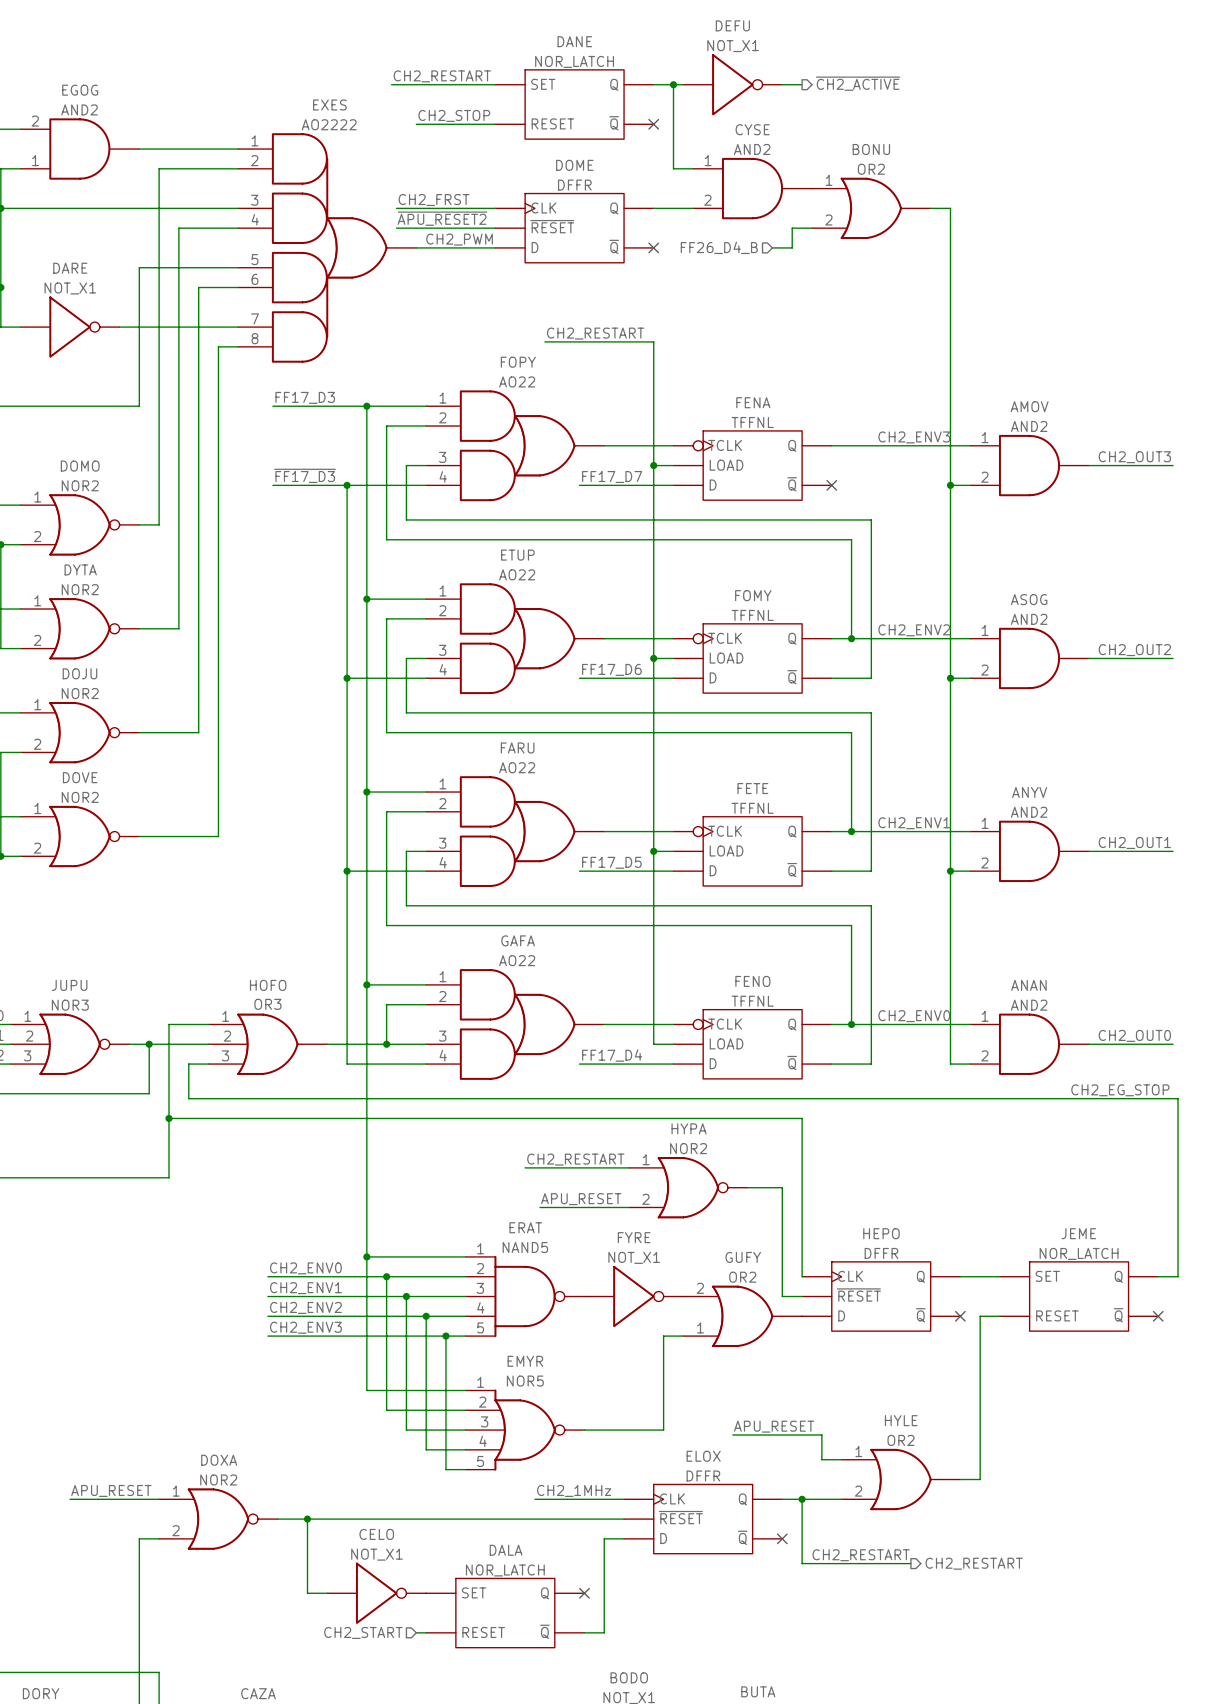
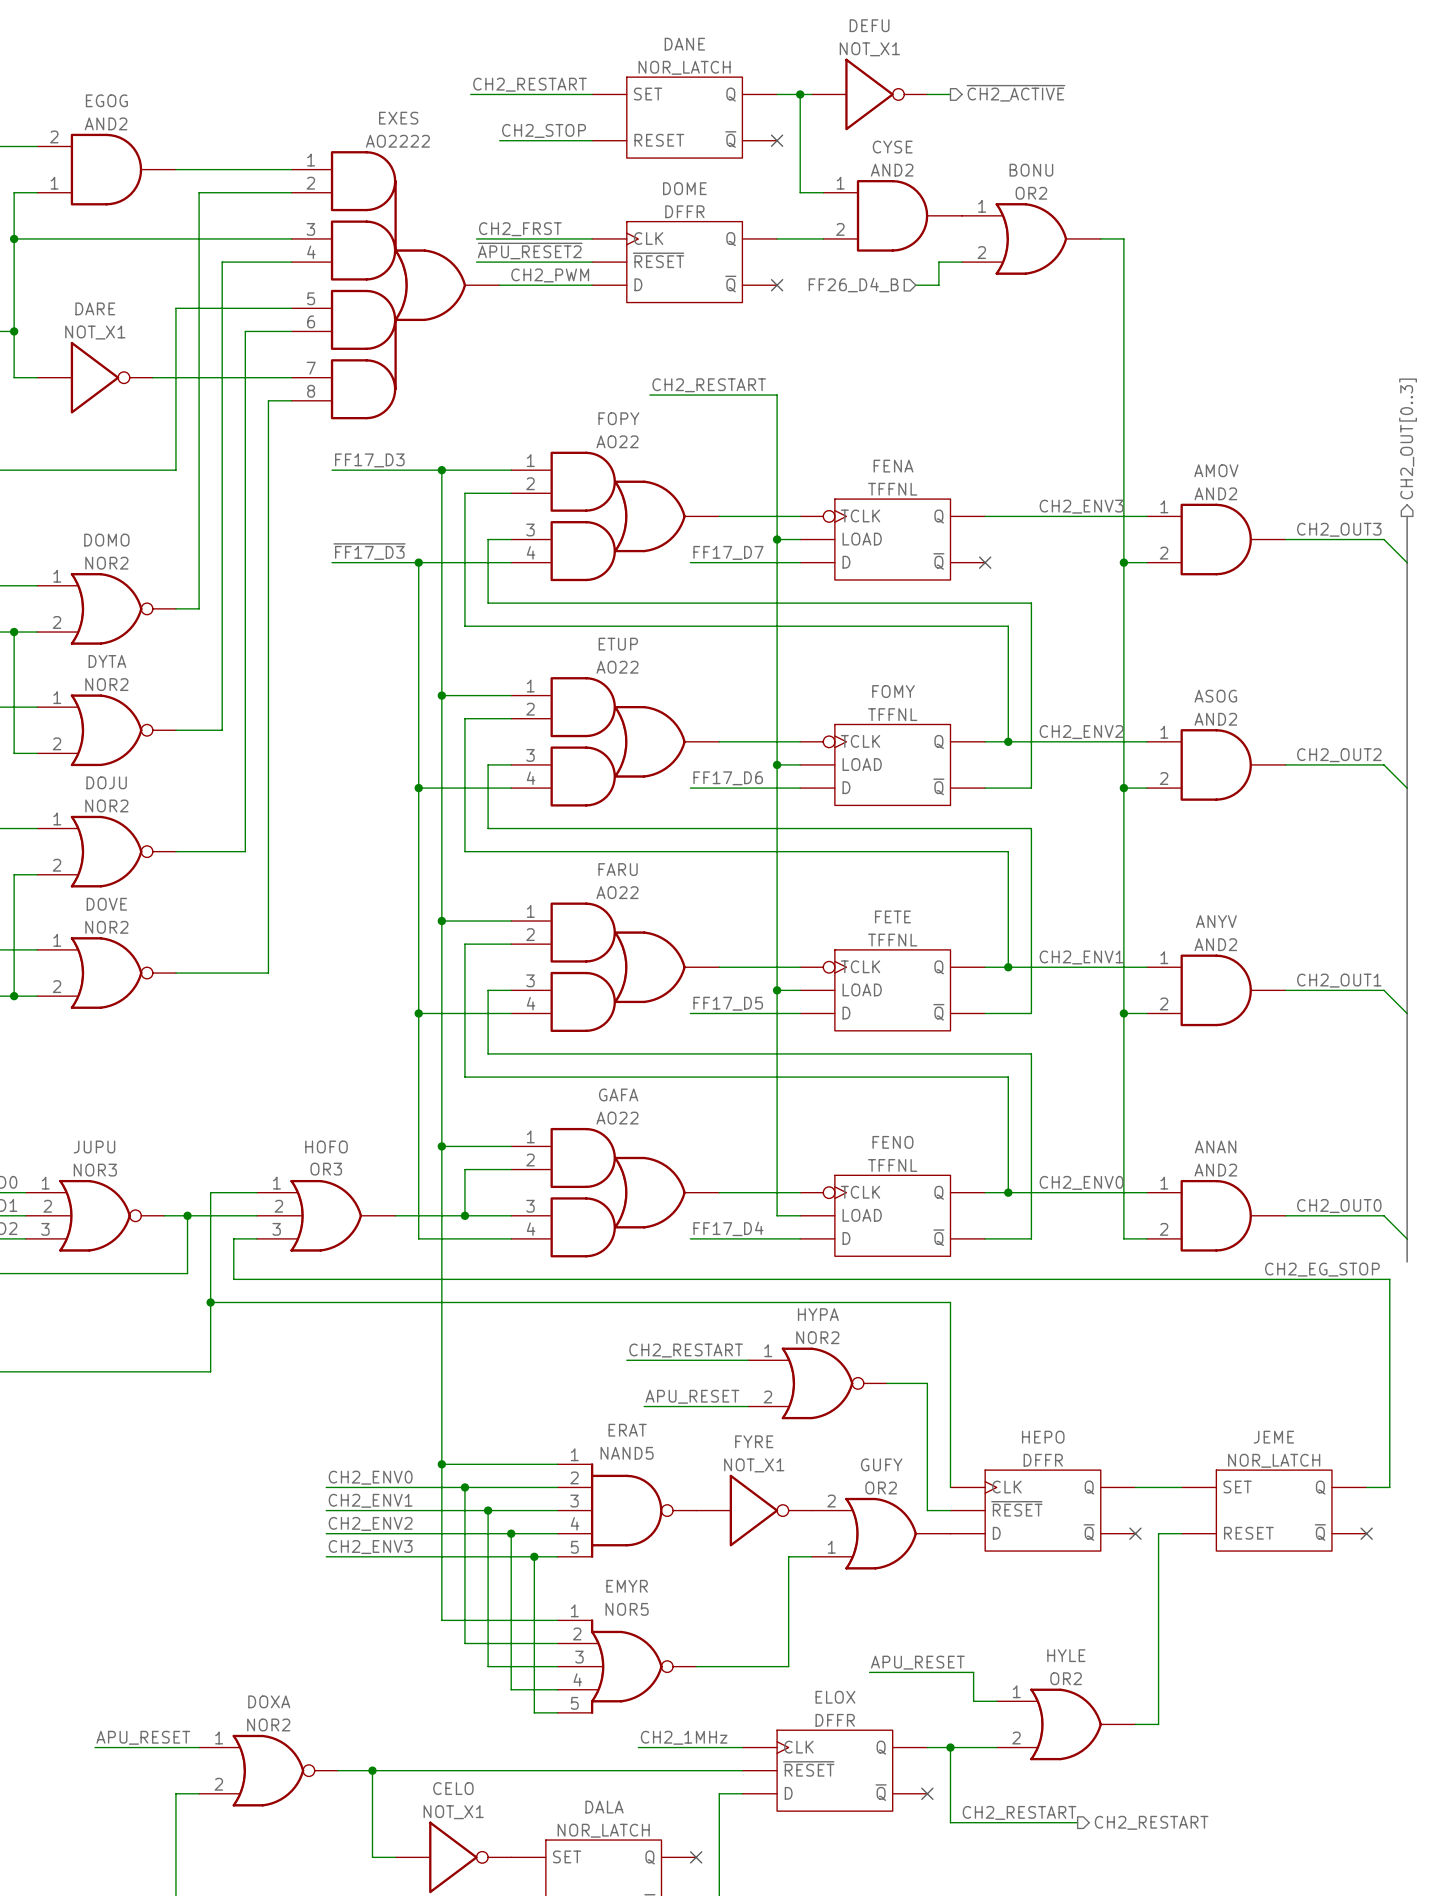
hierarchical label: none -> CH2_OUT[0..3] (1408, 438)
bus: none -> (1407, 516) (1407, 1262)
wire: none -> (1383, 539) (1407, 562)
wire: none -> (1383, 764) (1407, 788)
wire: none -> (1383, 990) (1407, 1013)
wire: none -> (1383, 1215) (1407, 1238)

